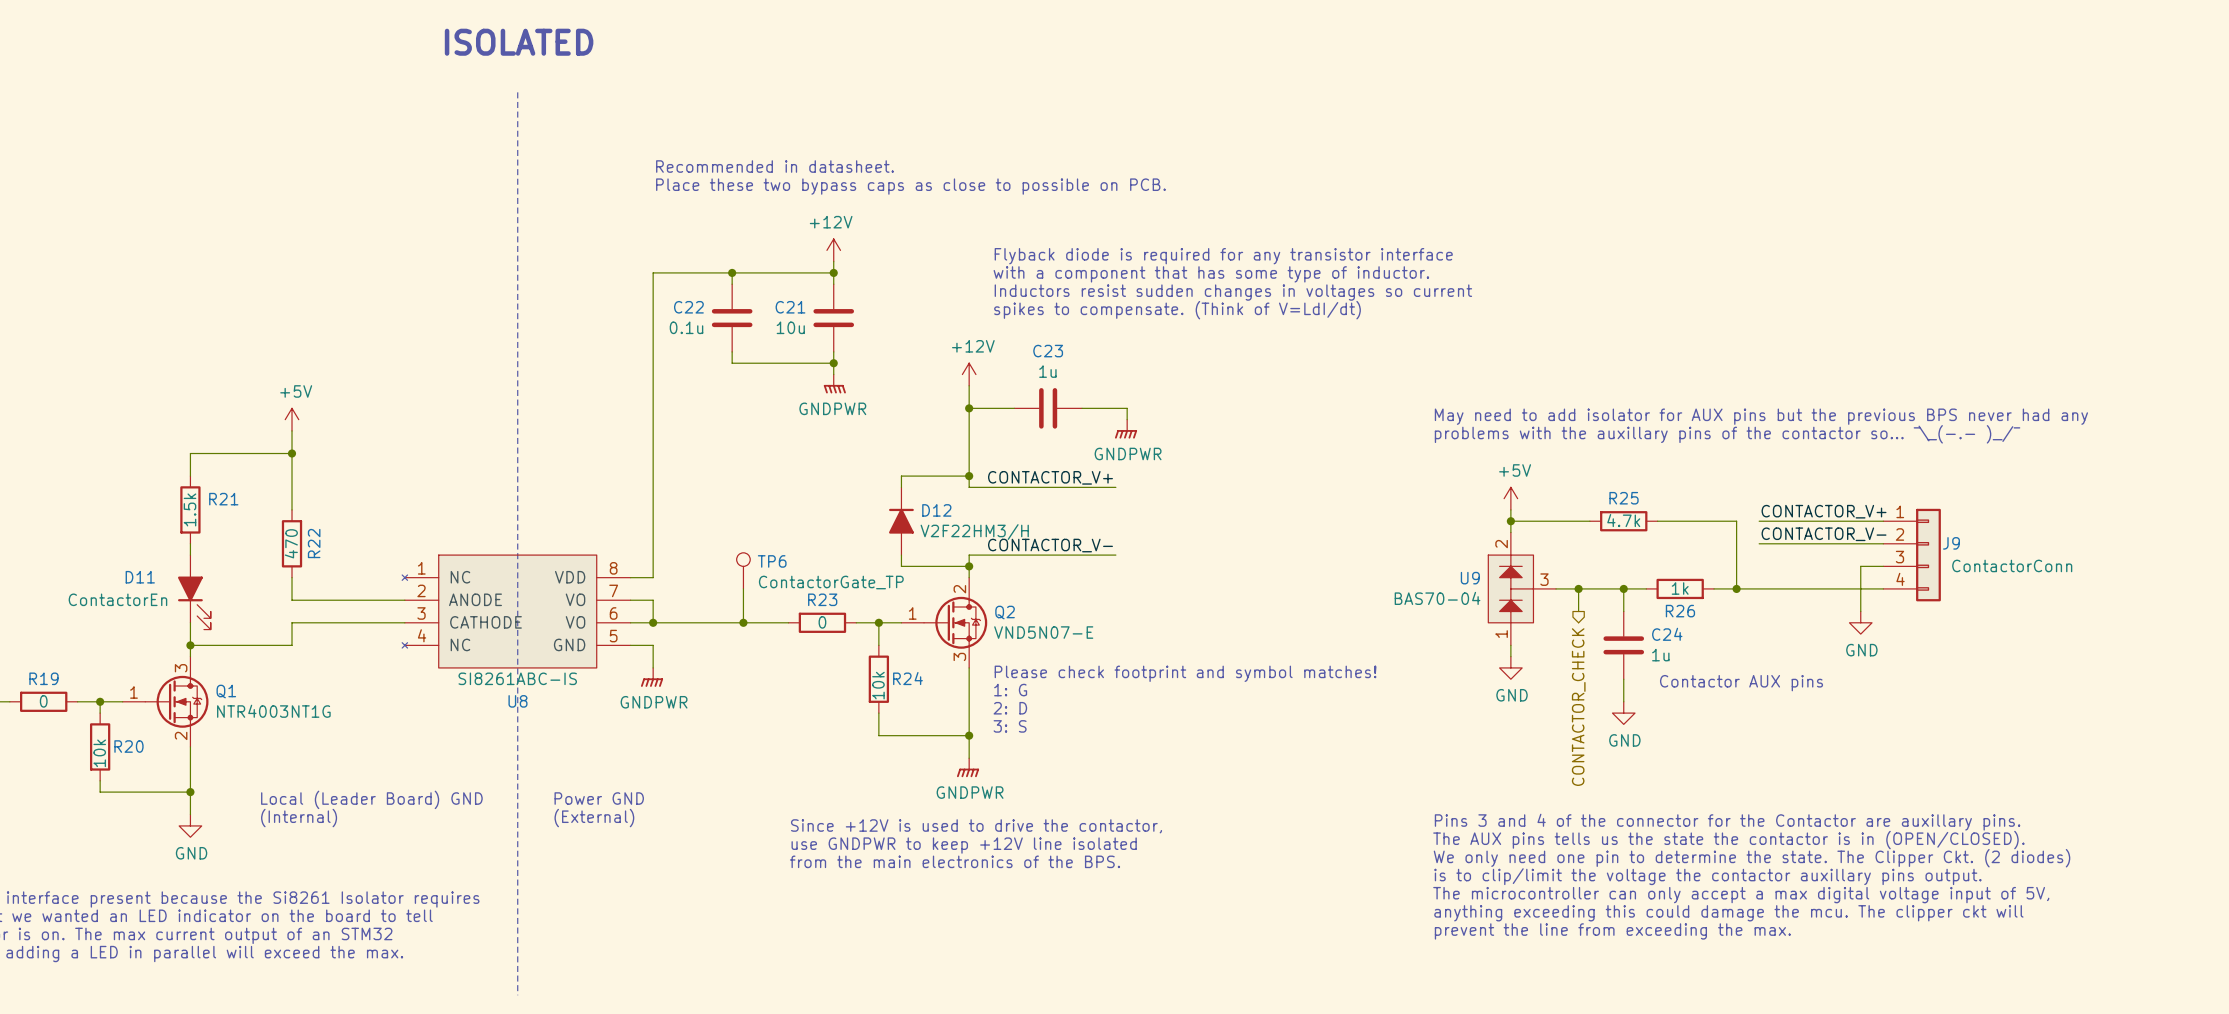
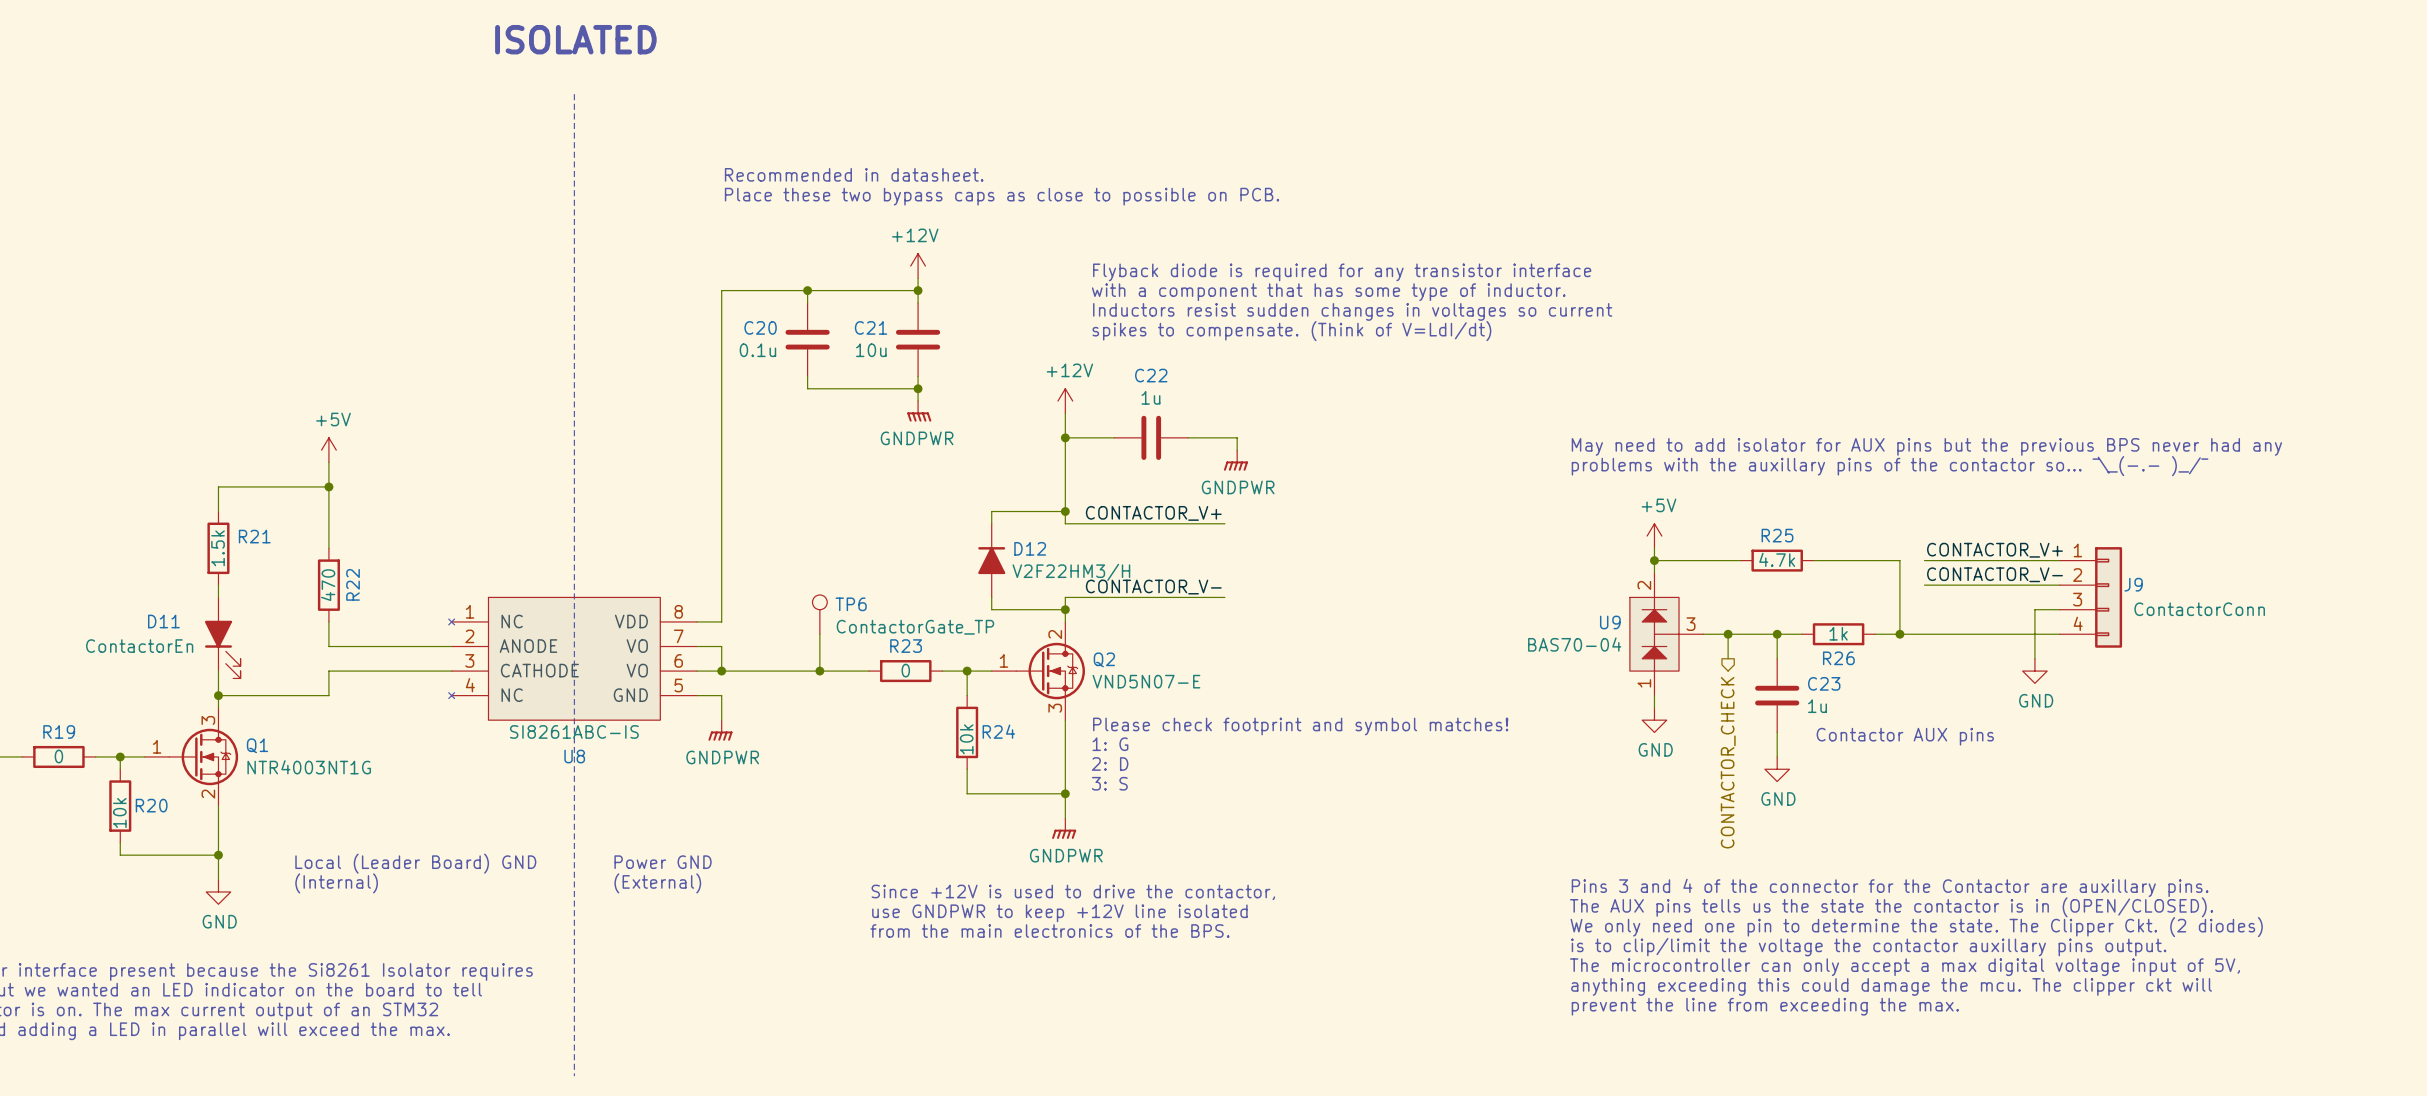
C22 name: C22 (688, 307) -> C20 (760, 327)
C23 name: C23 (1048, 351) -> C22 (1151, 375)
C24 name: C24 (1667, 634) -> C23 (1824, 683)

